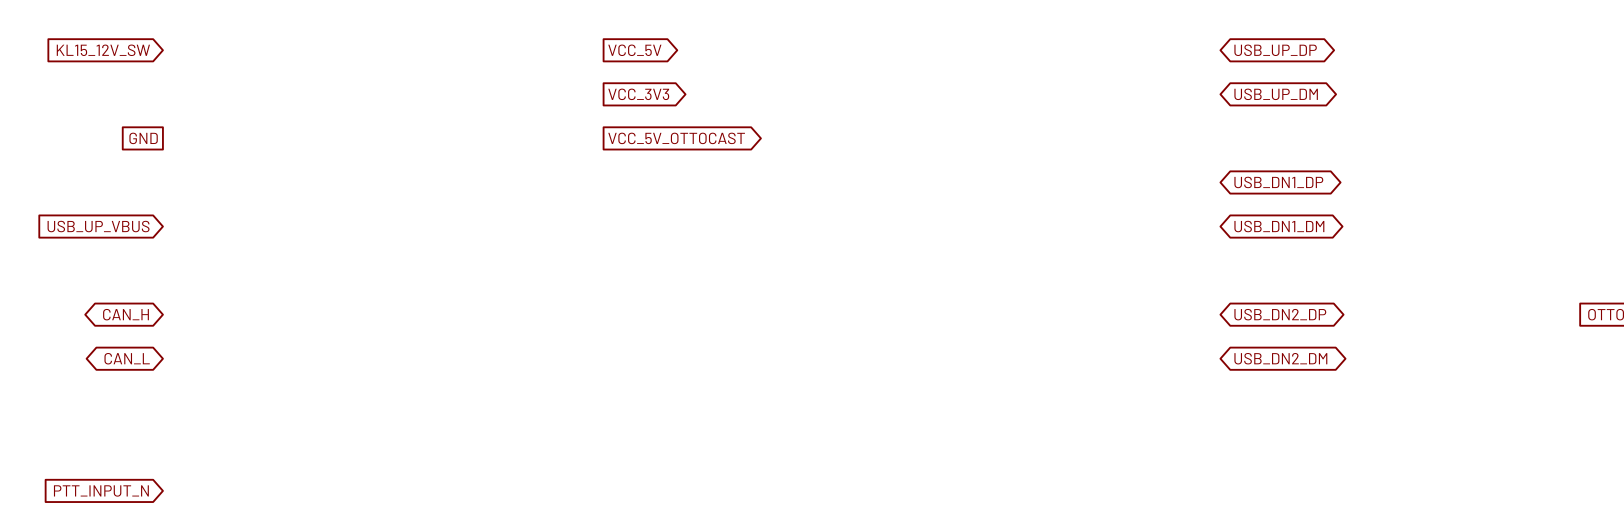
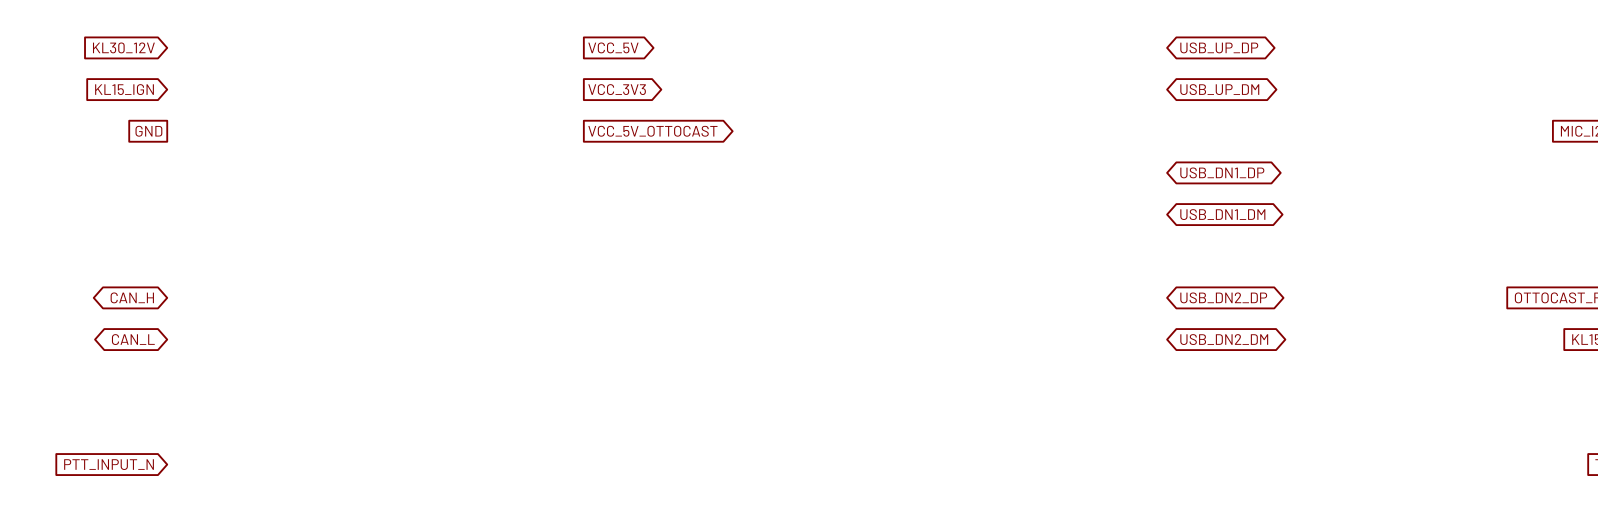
global label: KL15_12V_SW (103, 50) -> KL30_12V (123, 47)
global label: none -> KL15_IGN (124, 89)
global label: USB_UP_VBUS (98, 226) -> none

